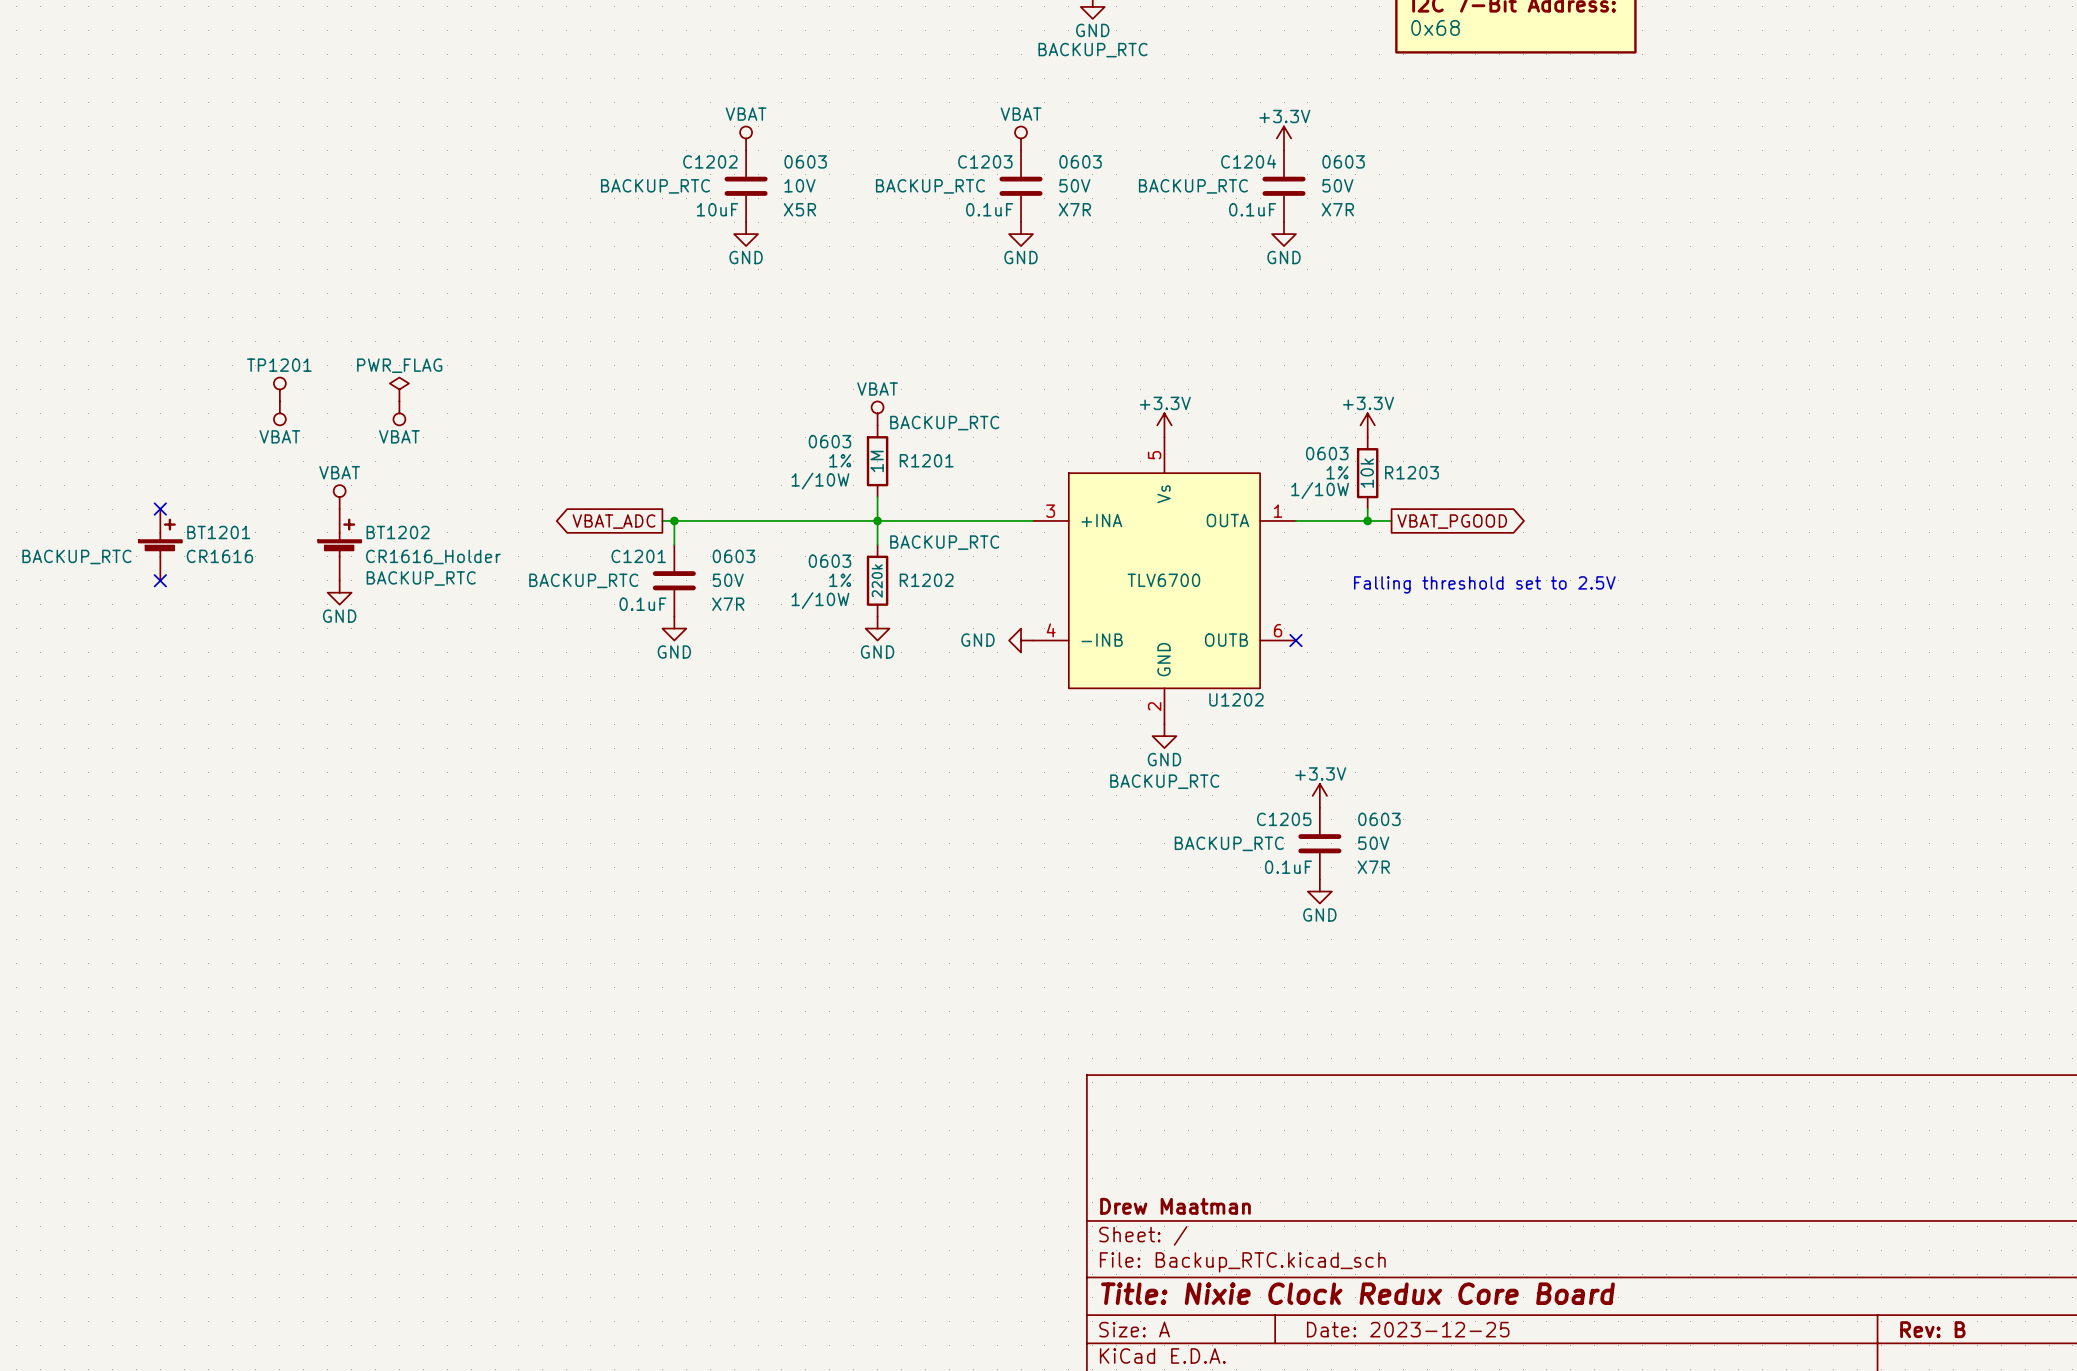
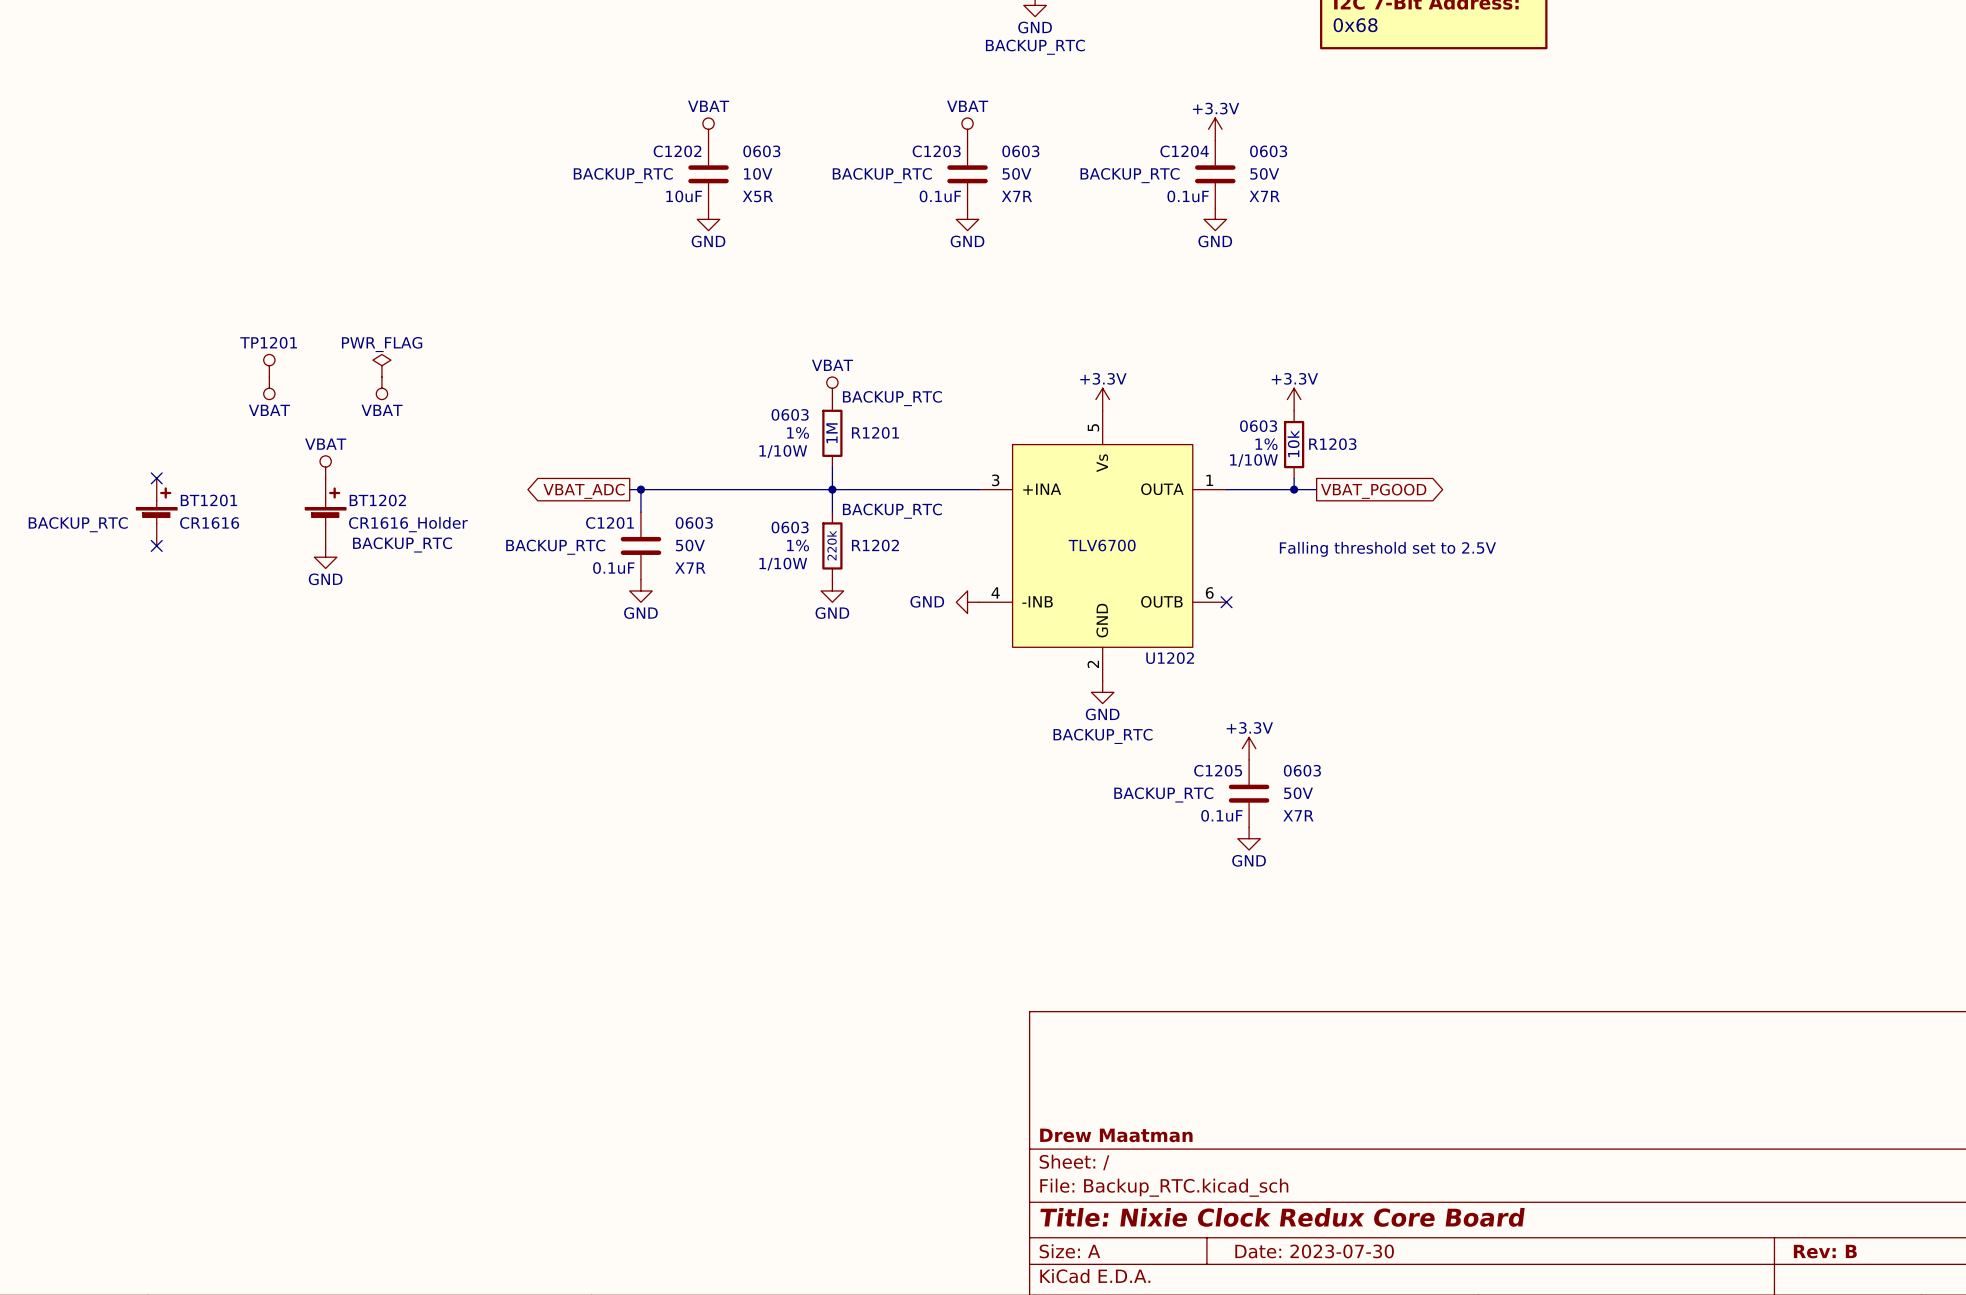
title block: Date: 2023-12-25 (1408, 1329) -> Date: 2023-07-30 (1314, 1251)

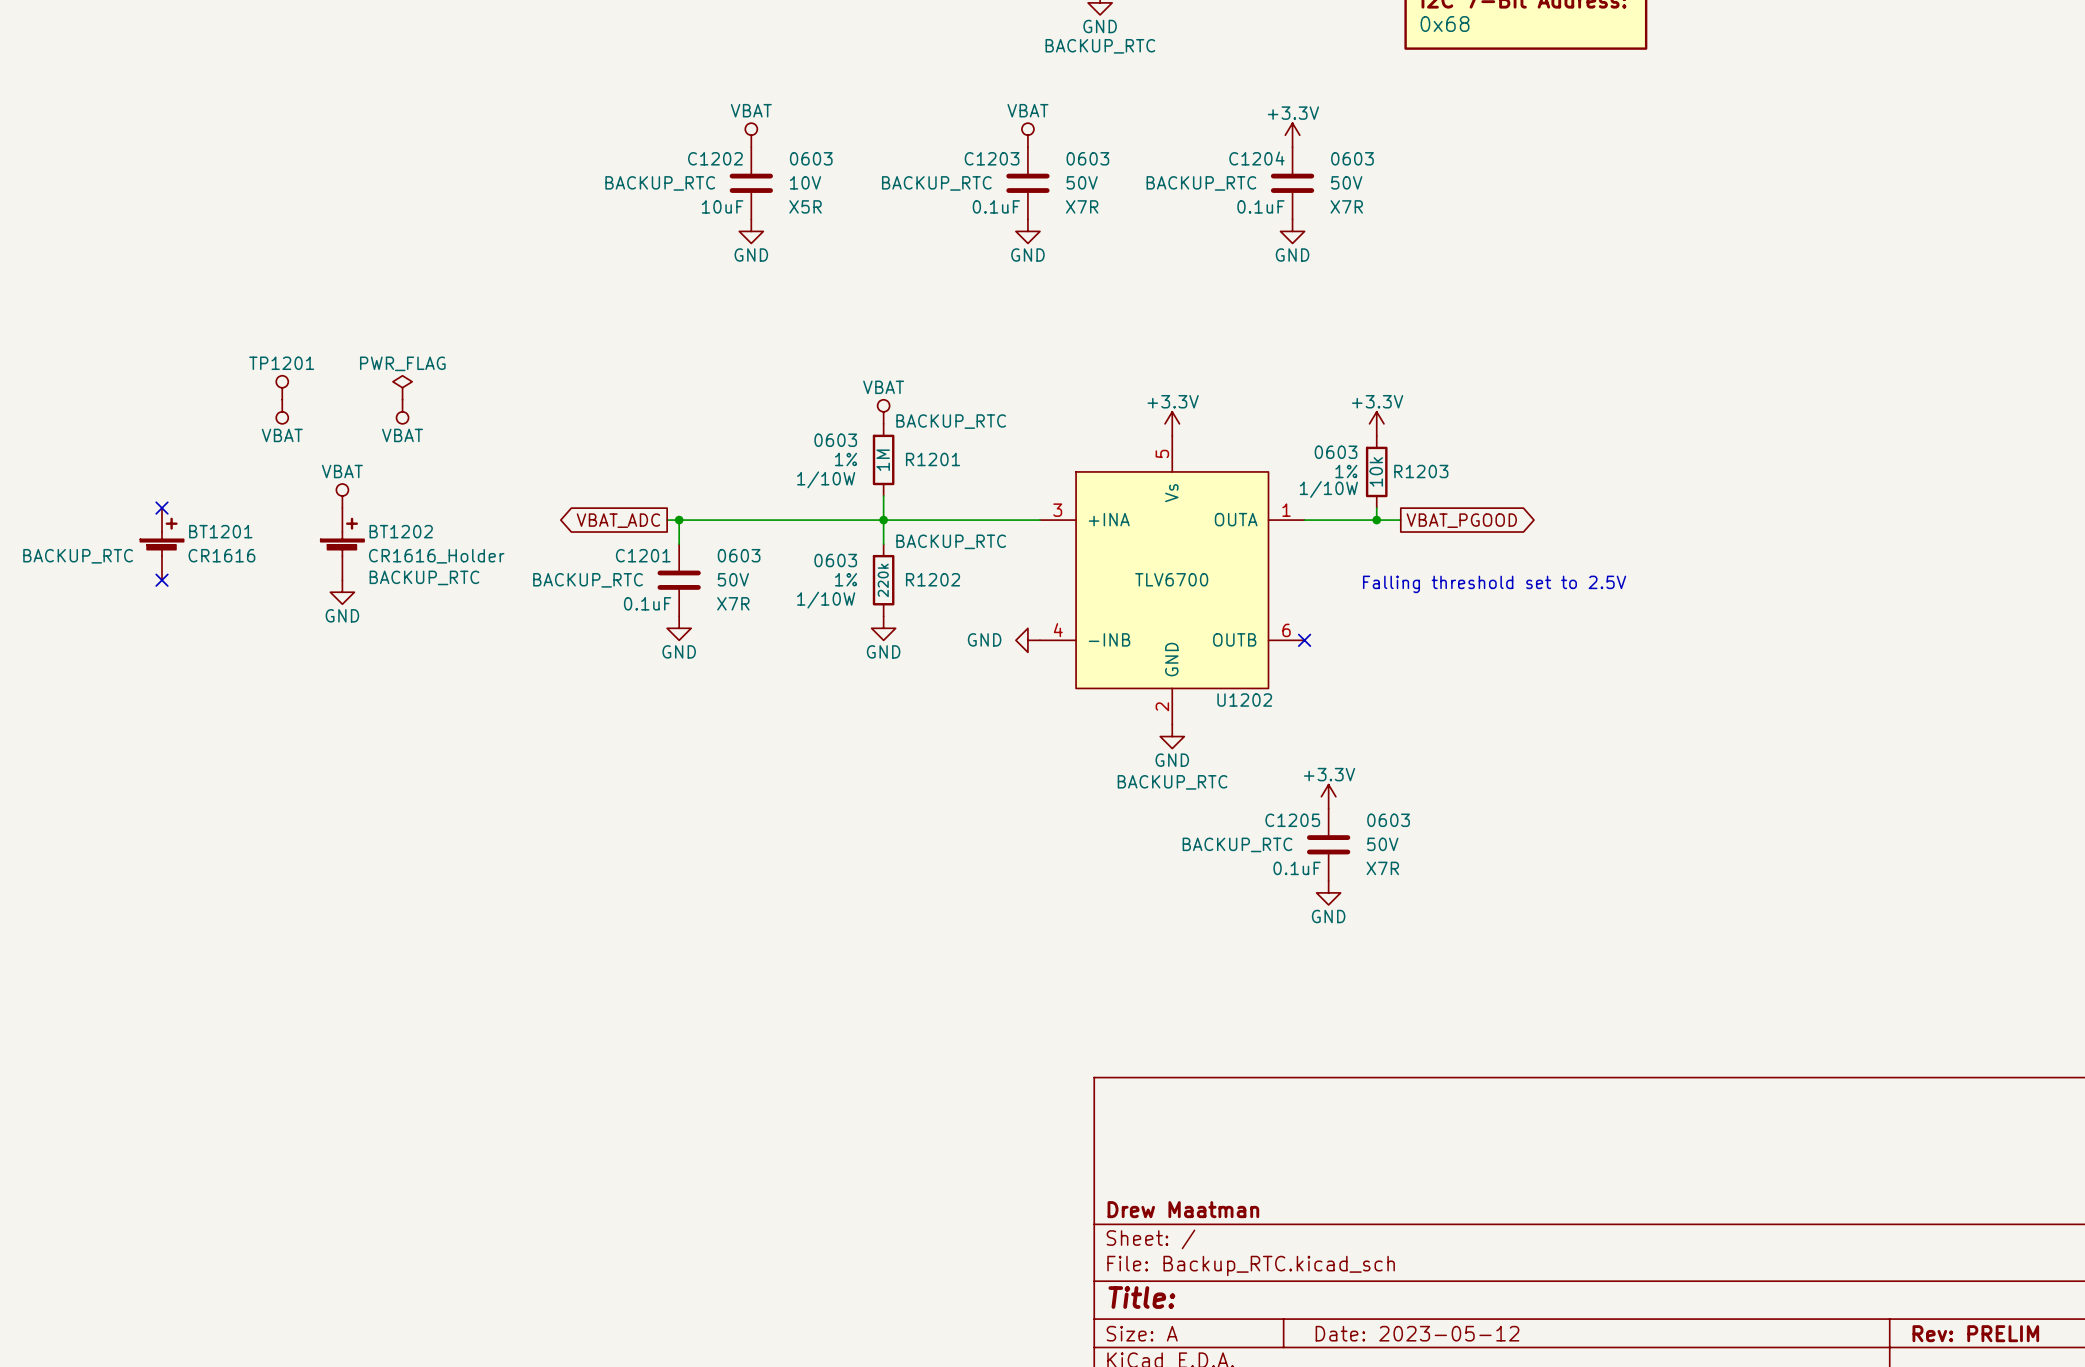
title block: Title: Nixie Clock Redux Core Board (1282, 1217) -> Title: (1141, 1297)
title block: Date: 2023-07-30 (1314, 1251) -> Date: 2023-05-12 (1417, 1333)
title block: Rev: B (1825, 1251) -> Rev: PRELIM (1975, 1333)

